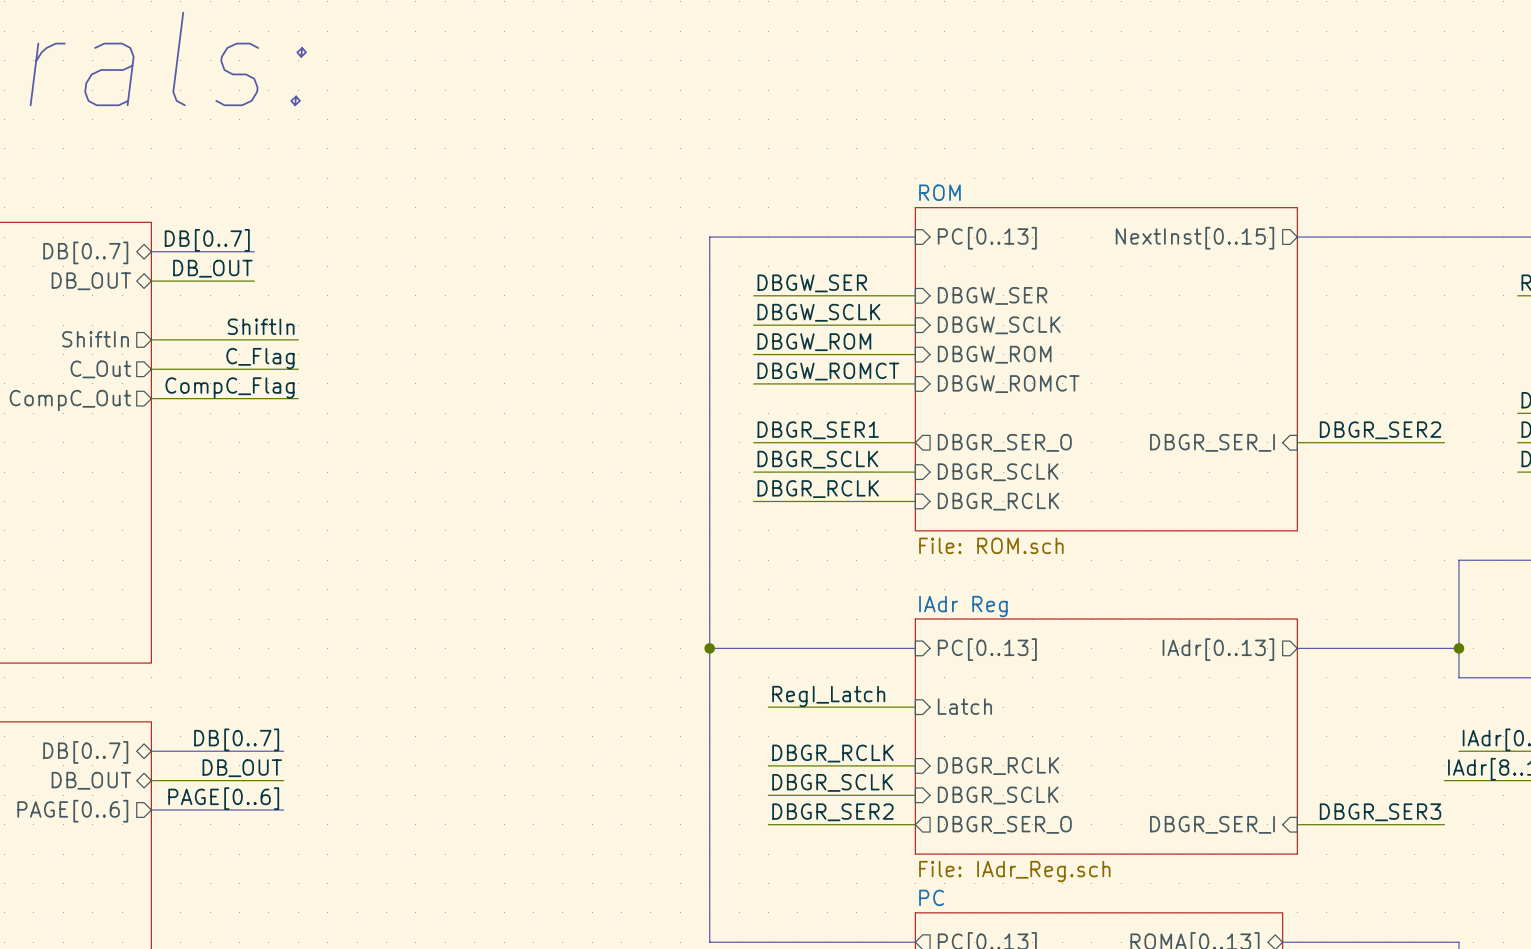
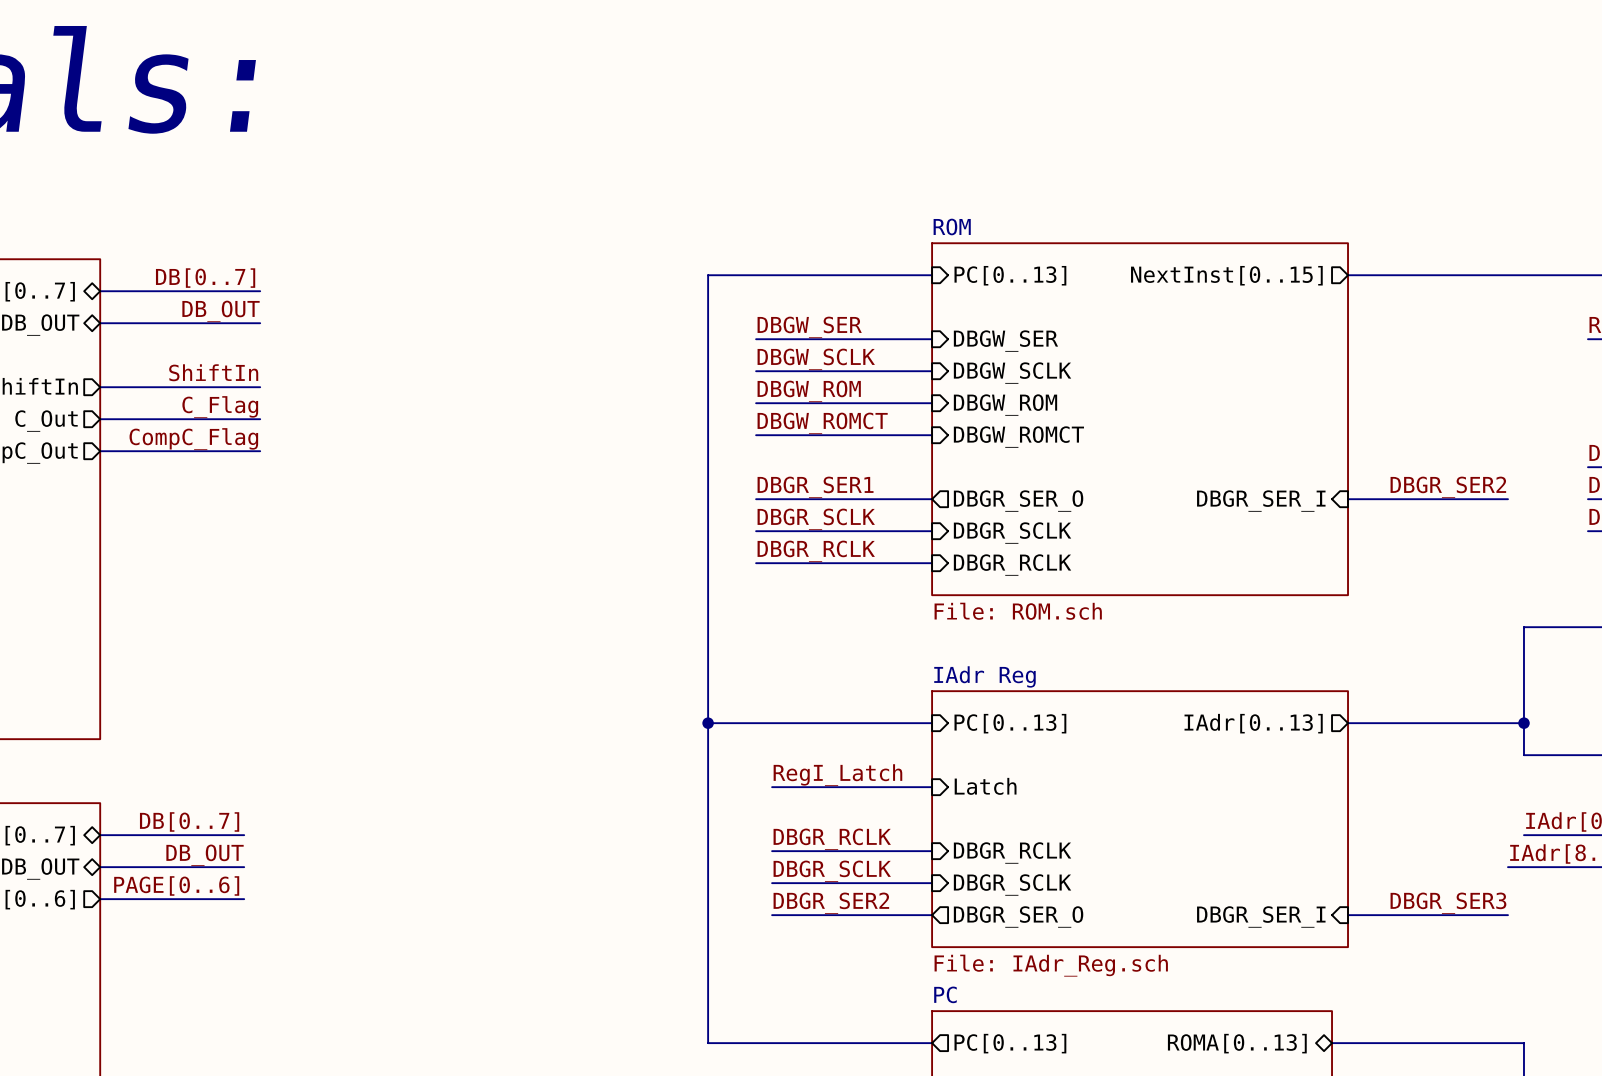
label position: DB[0..7] (207, 240) -> DB[0..7] (205, 278)
bus: none -> (212, 291) (260, 291)
label position: DB_OUT (212, 268) -> DB_OUT (221, 311)
wire: none -> (212, 323) (260, 323)

